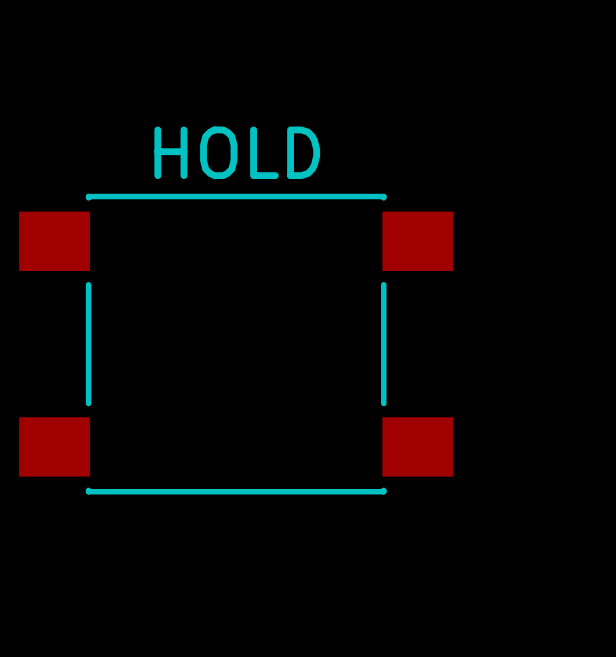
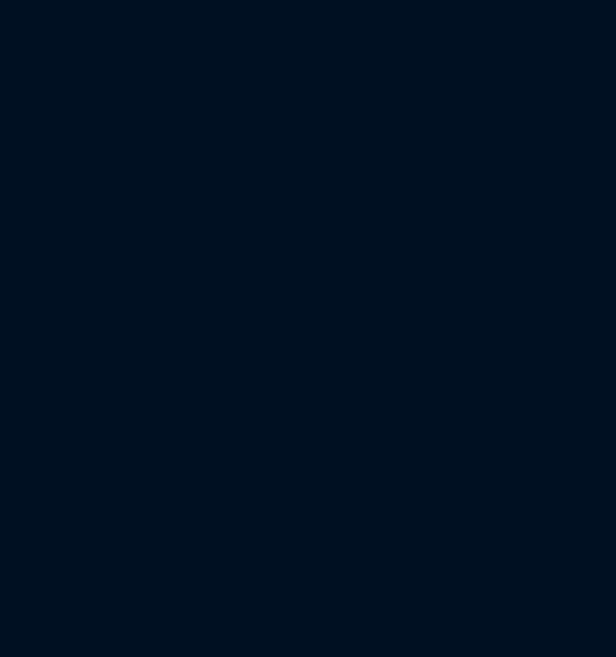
part: HOLD (236, 344) -> none

